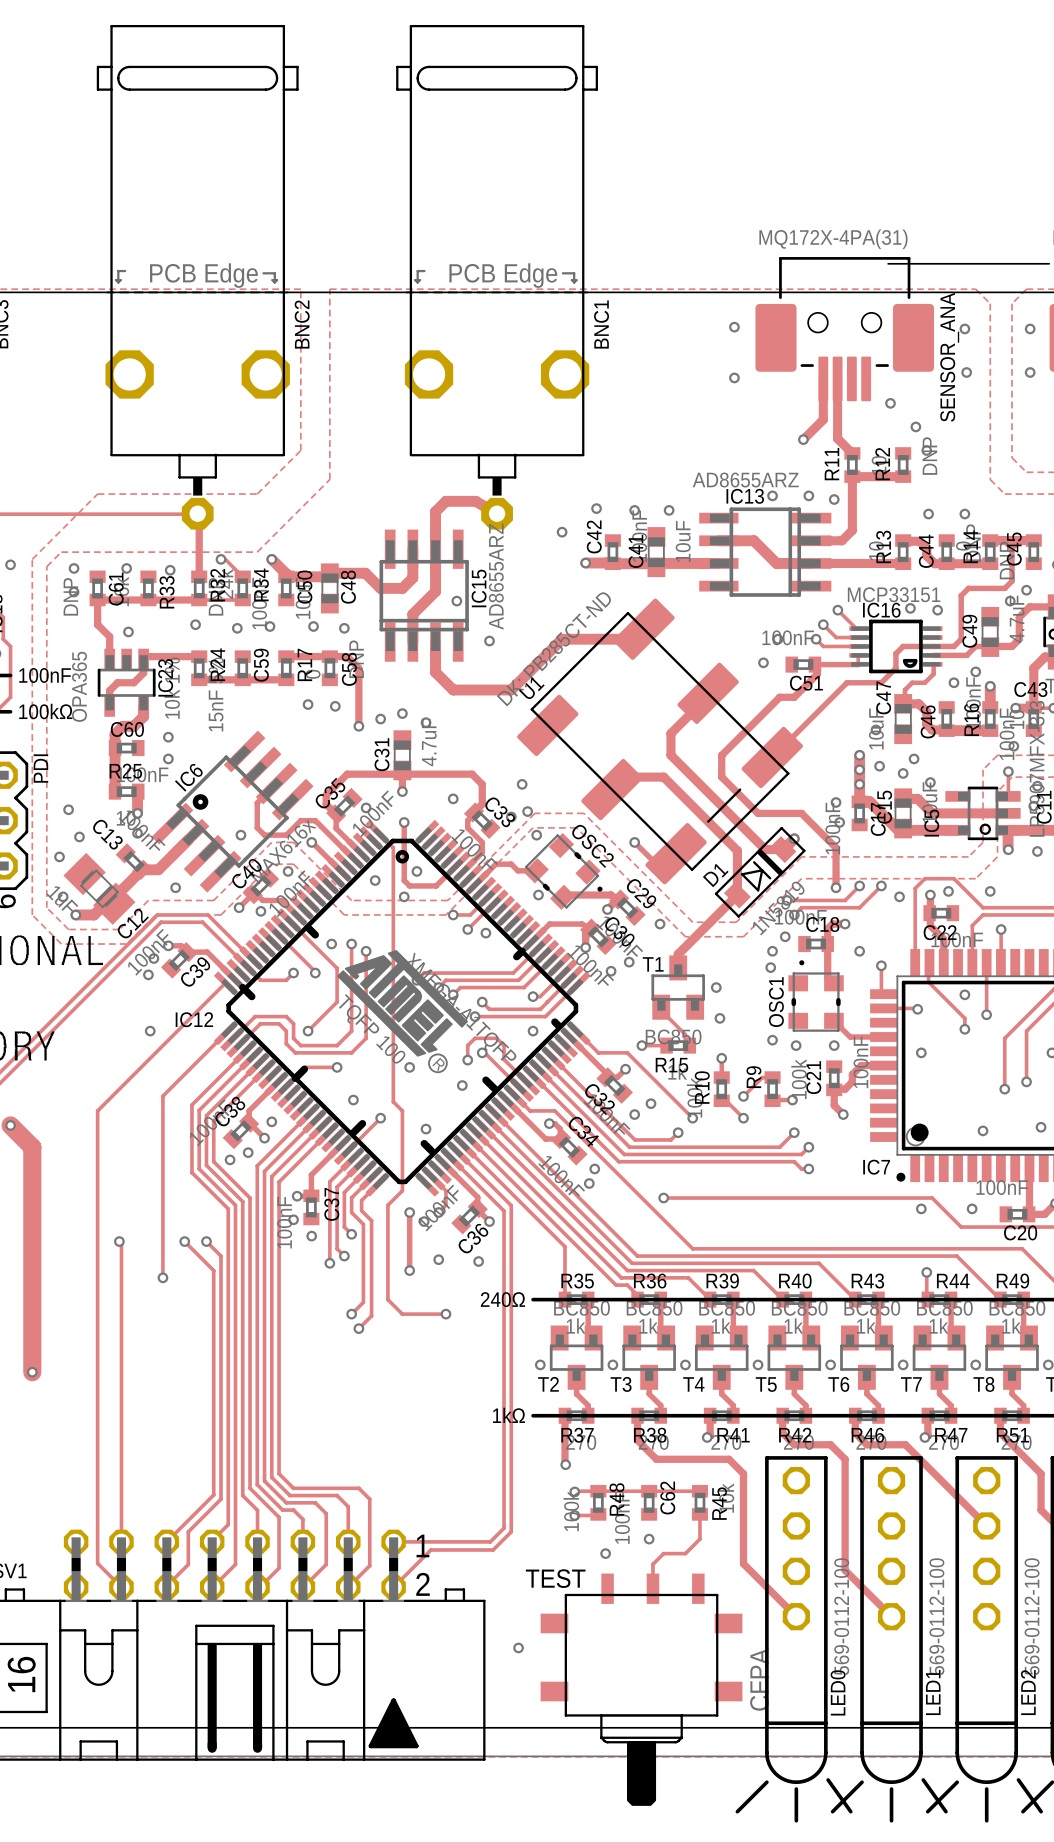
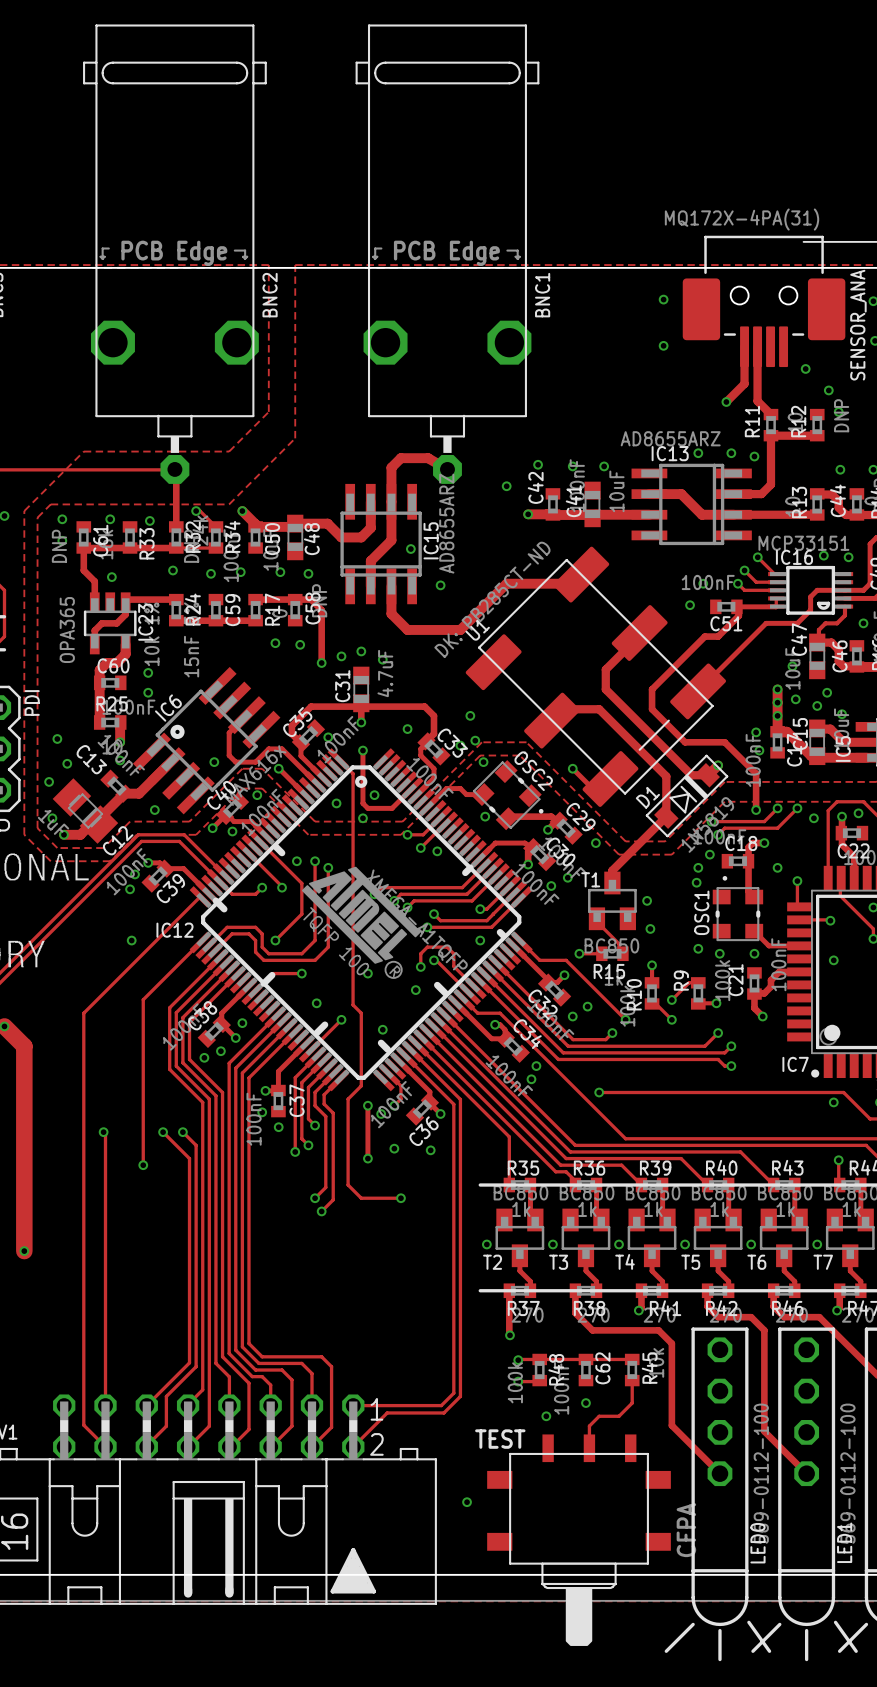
text: 100nF (45, 675) -> none
text: 100kΩ (45, 711) -> none
text: 240Ω (502, 1299) -> none
text: 1kΩ (508, 1415) -> none

